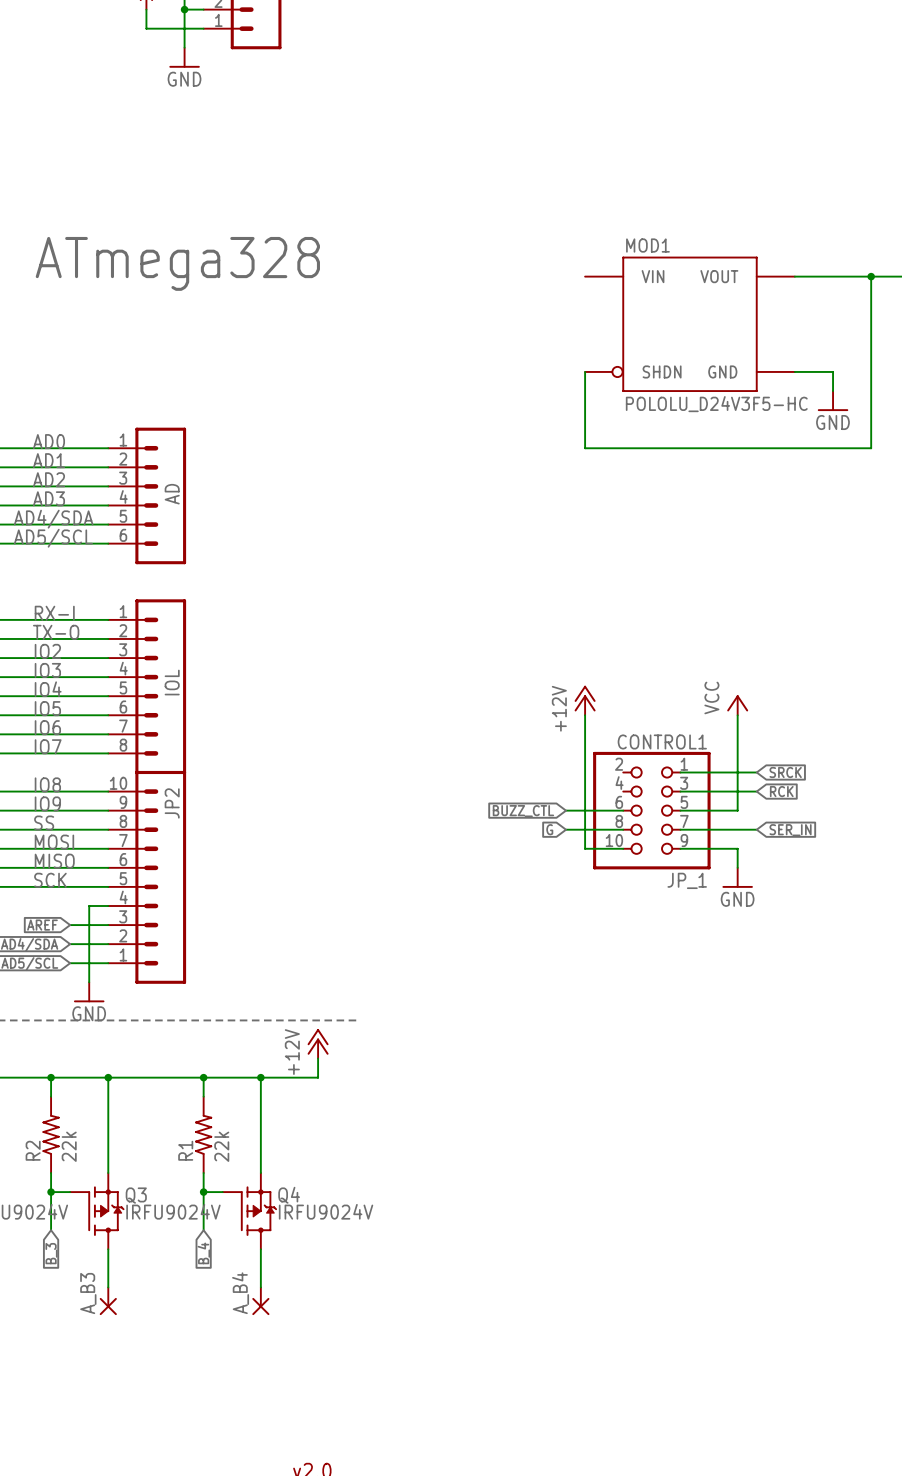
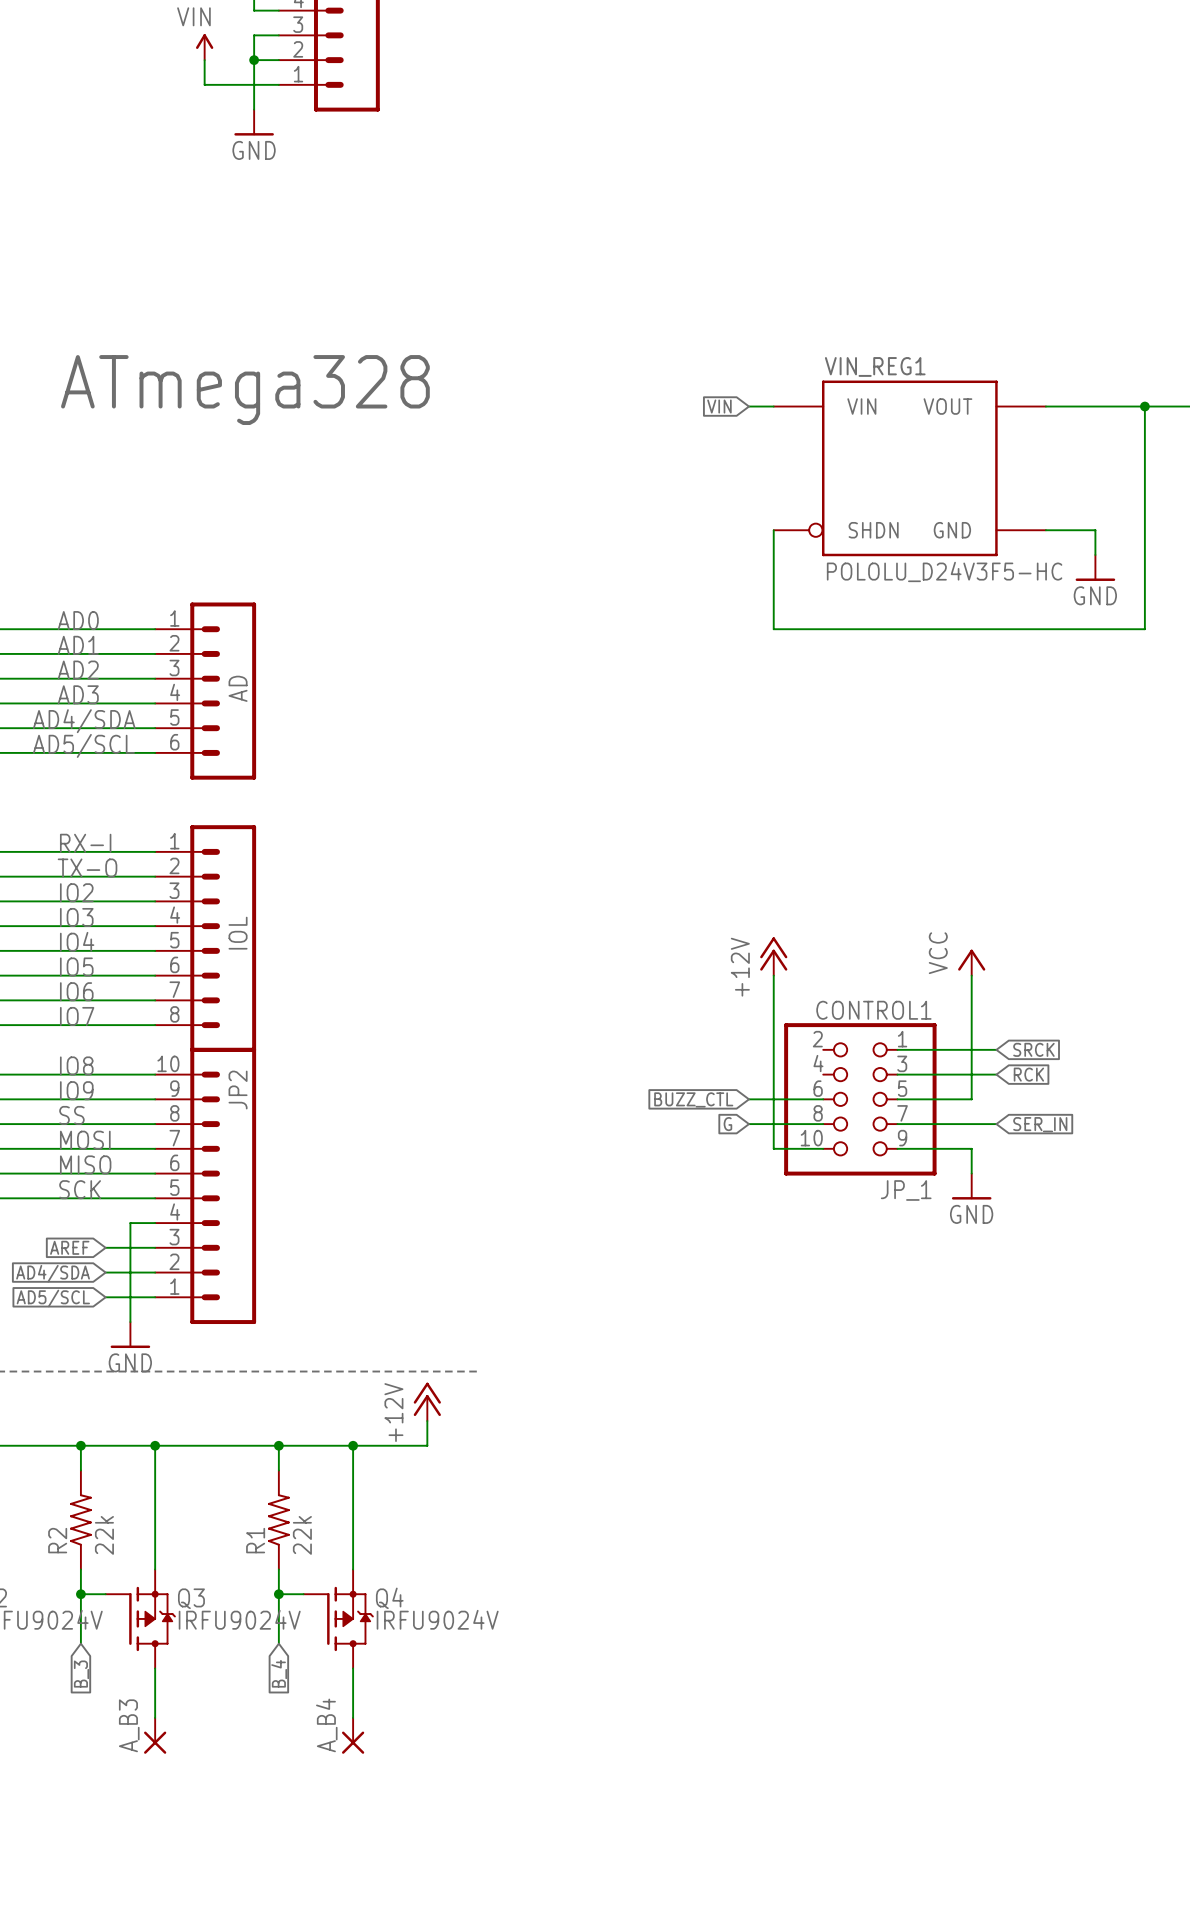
MOD1 name: MOD1 (647, 245) -> VIN_REG1 (875, 366)
global label: none -> VIN (719, 406)
wire: none -> (749, 406) (773, 406)

